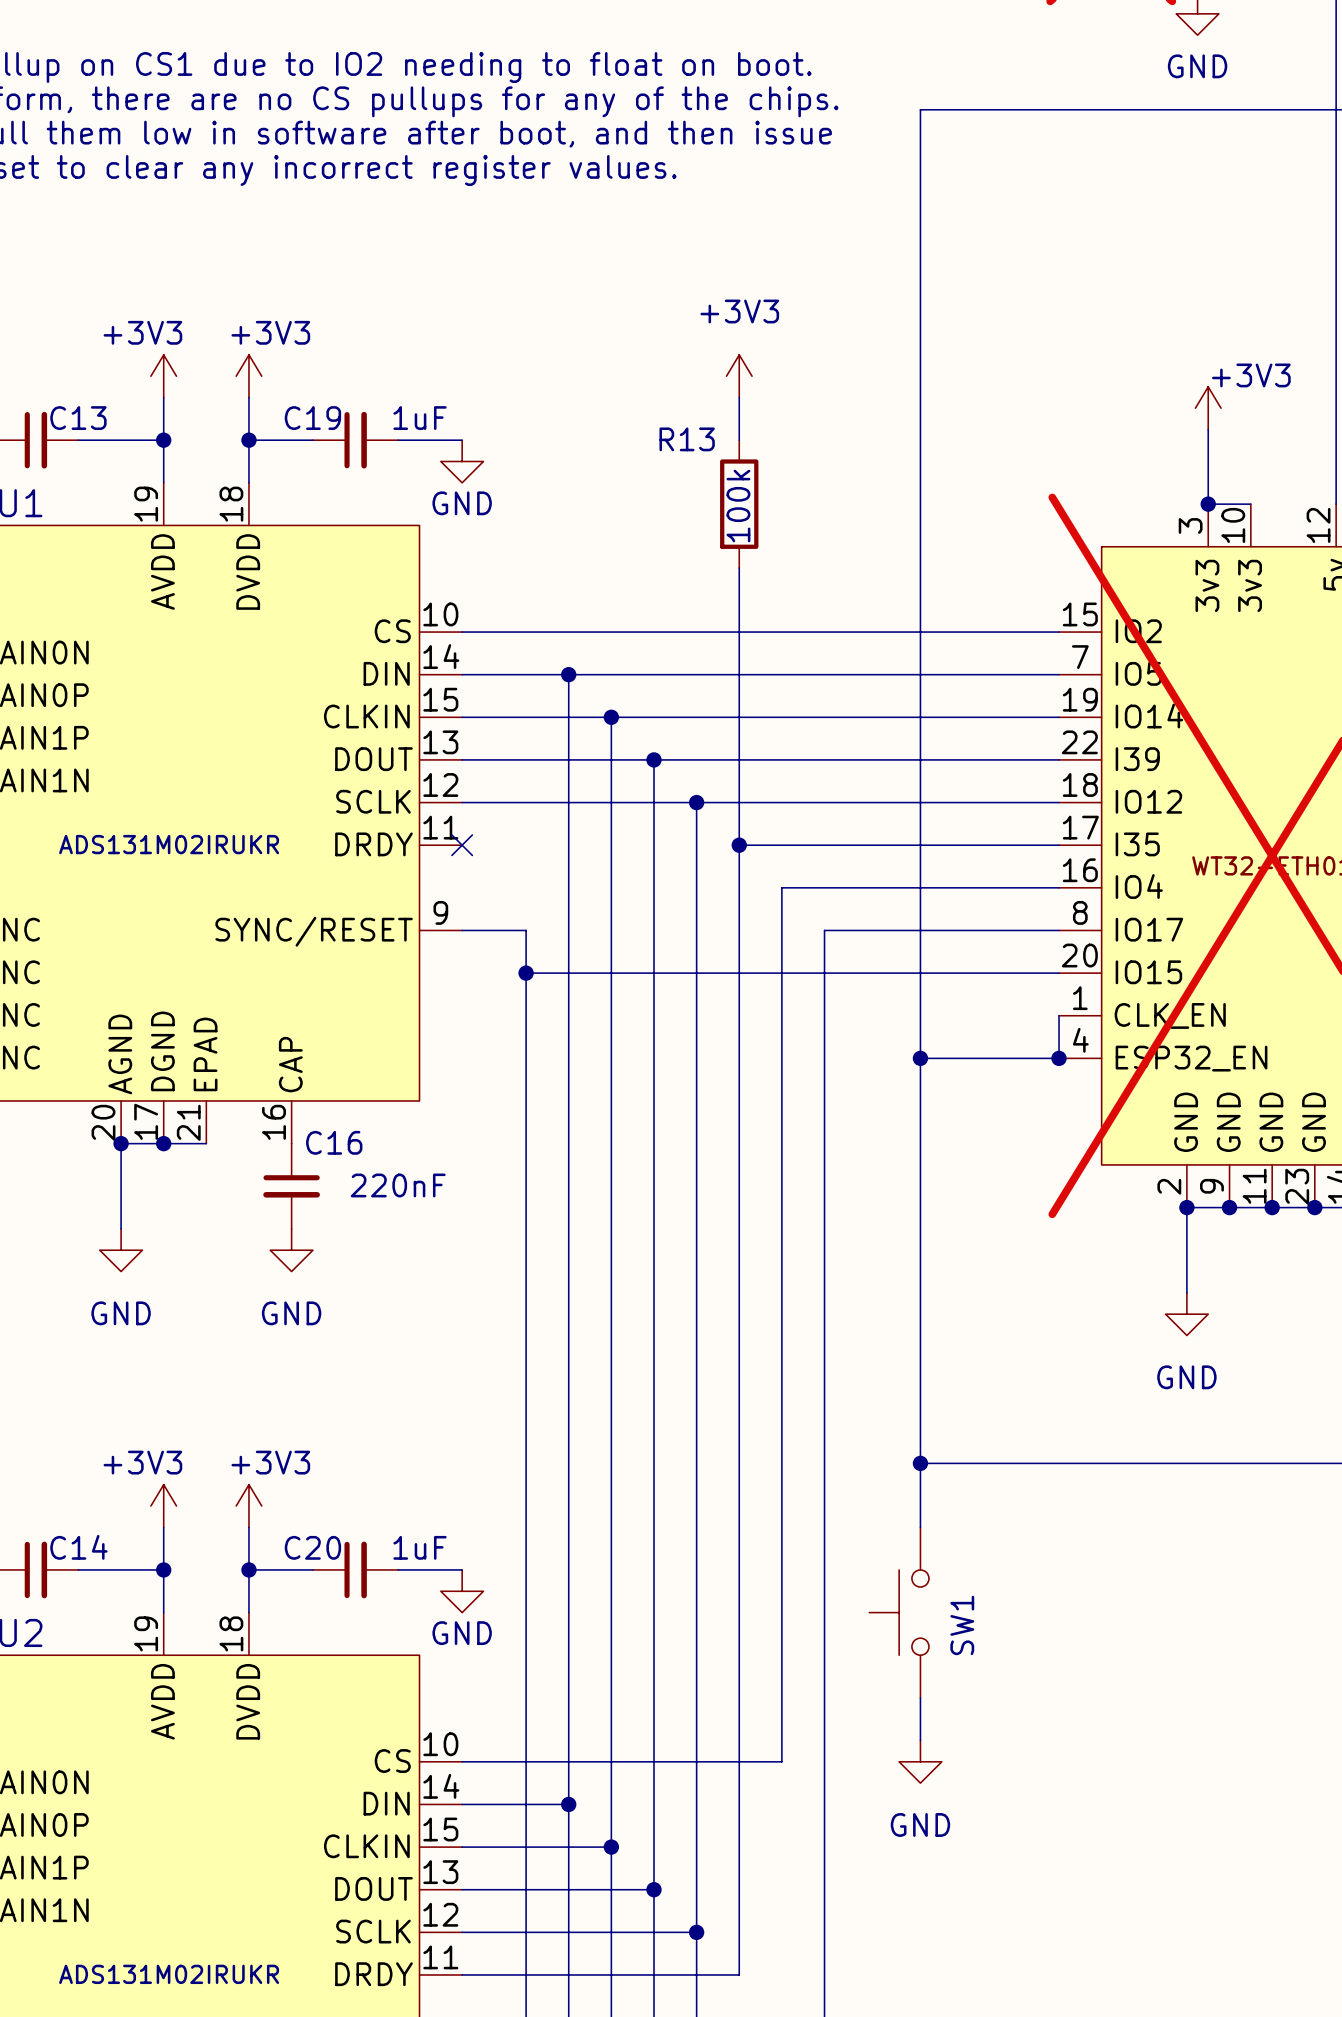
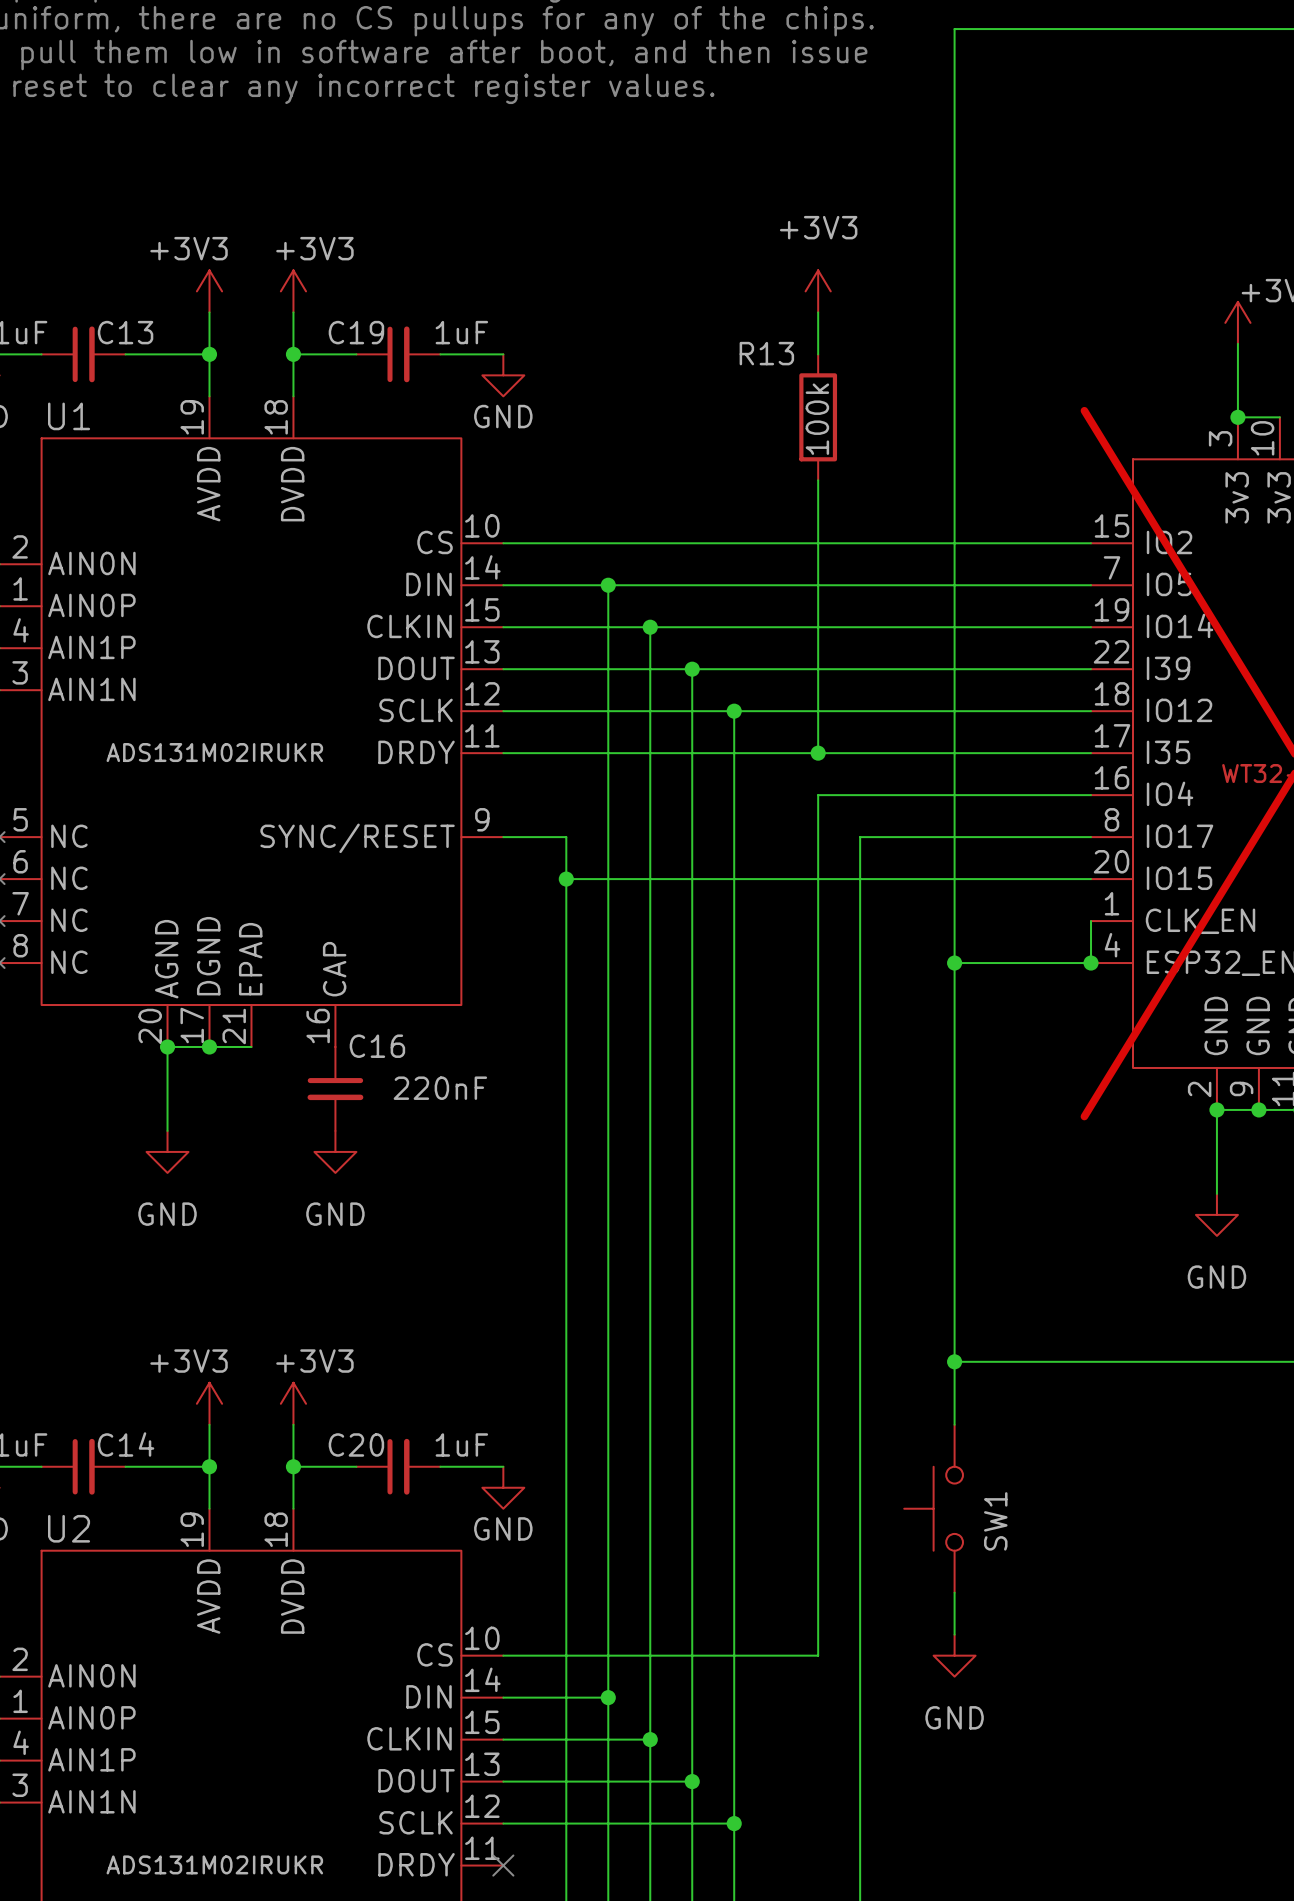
power symbol position: +3V3 (739, 376) -> +3V3 (818, 291)
wire: (739, 397) (739, 440) -> (818, 312) (818, 354)
R13 position: (739, 504) -> (818, 417)
wire: (739, 568) (739, 1974) (462, 1974) -> none
wire: none -> (818, 480) (818, 753)
wire: none -> (503, 753) (776, 753)
no-connect mark: (462, 845) -> none
junction position: (739, 845) -> (818, 753)
no-connect mark: none -> (503, 1865)

